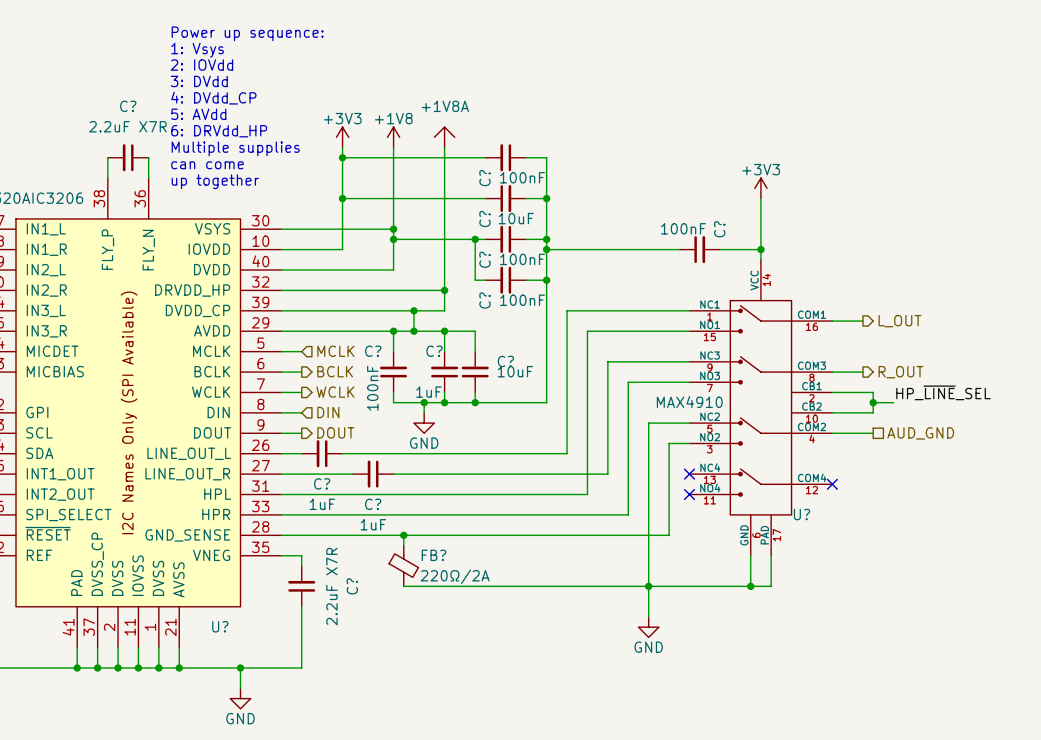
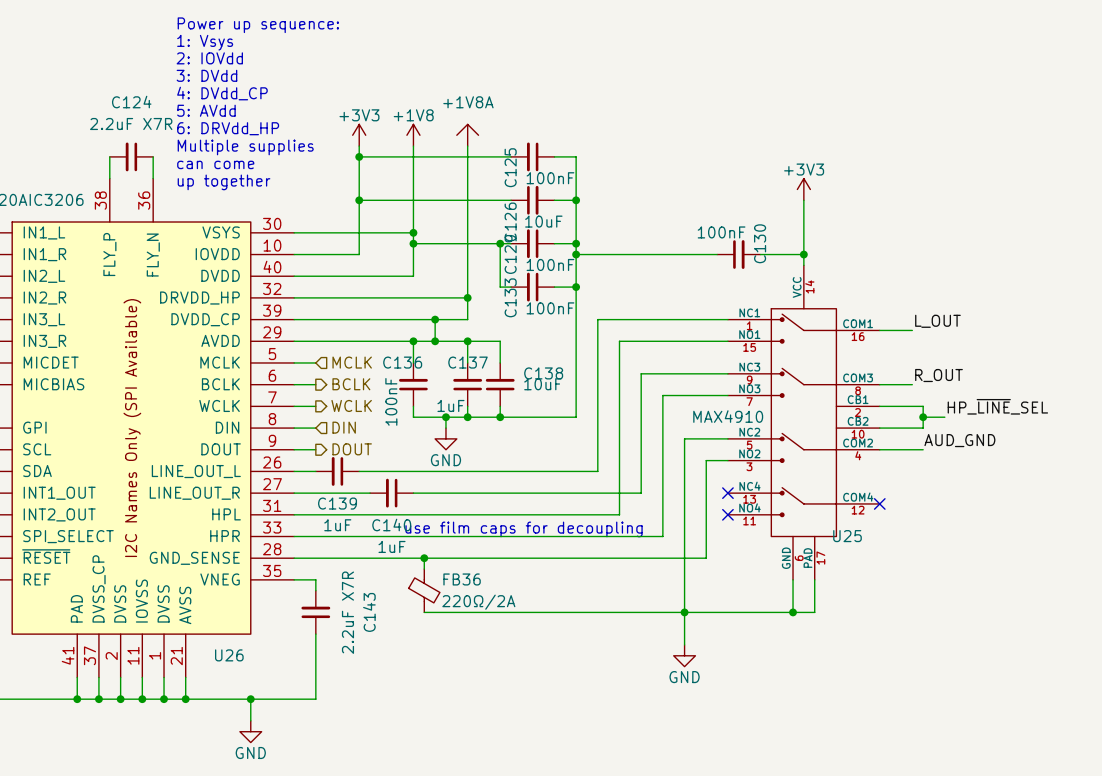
C? name: C? (128, 106) -> C124 (131, 102)
C? name: C? (485, 178) -> C125 (510, 167)
C? name: C? (485, 218) -> C126 (510, 222)
C? name: C? (719, 229) -> C130 (760, 243)
C? name: C? (485, 259) -> C129 (510, 254)
C? name: C? (485, 300) -> C133 (510, 297)
label: none -> L_OUT (937, 321)
hierarchical label: L_OUT (900, 321) -> none
C? name: C? (373, 351) -> C136 (402, 362)
C? name: C? (434, 351) -> C137 (468, 362)
C? name: C? (505, 361) -> C138 (543, 373)
label: none -> R_OUT (938, 375)
hierarchical label: R_OUT (901, 372) -> none
label: none -> AUD_GND (959, 440)
hierarchical label: AUD_GND (920, 433) -> none
C? name: C? (322, 483) -> C139 (337, 503)
C? name: C? (373, 504) -> C140 (391, 525)
text: none -> use film caps for decoupling (524, 529)
U? name: U? (802, 514) -> U25 (847, 536)
FB? name: FB? (433, 555) -> FB36 (462, 579)
C? name: C? (352, 586) -> C143 (369, 612)
U? name: U? (220, 626) -> U26 (229, 655)

